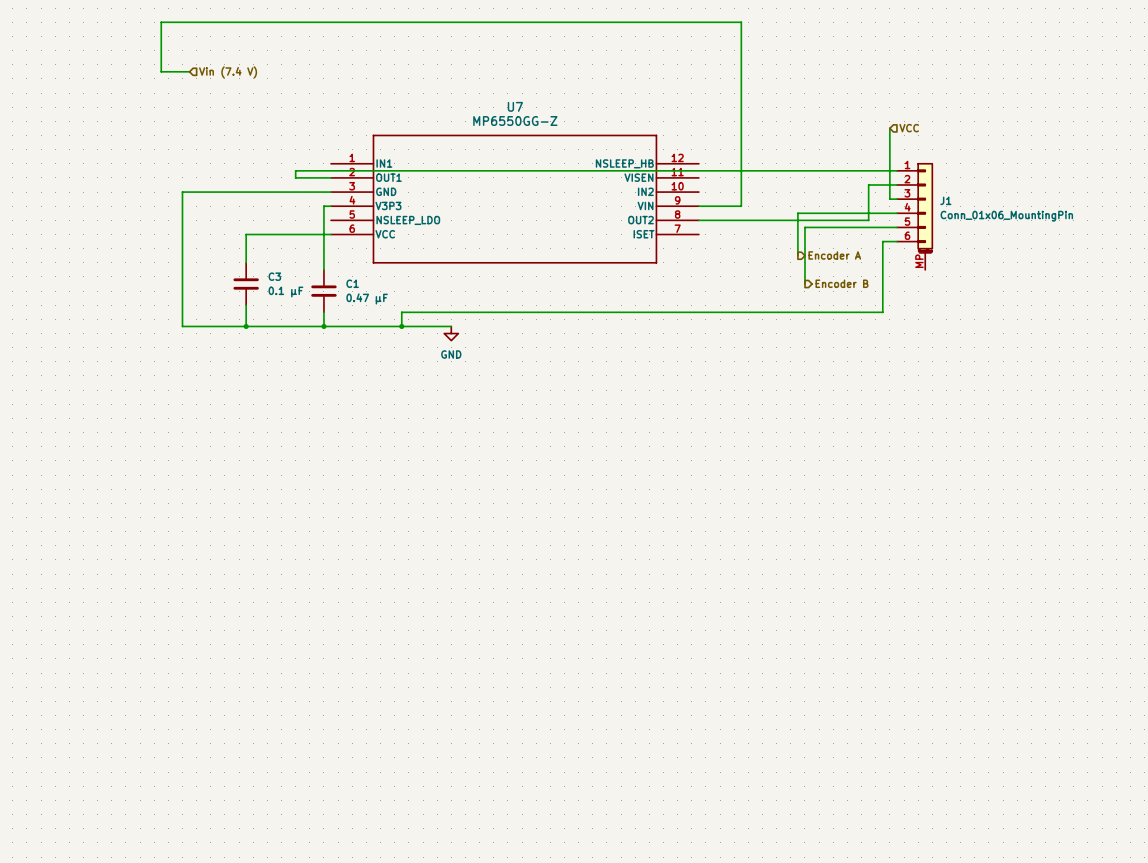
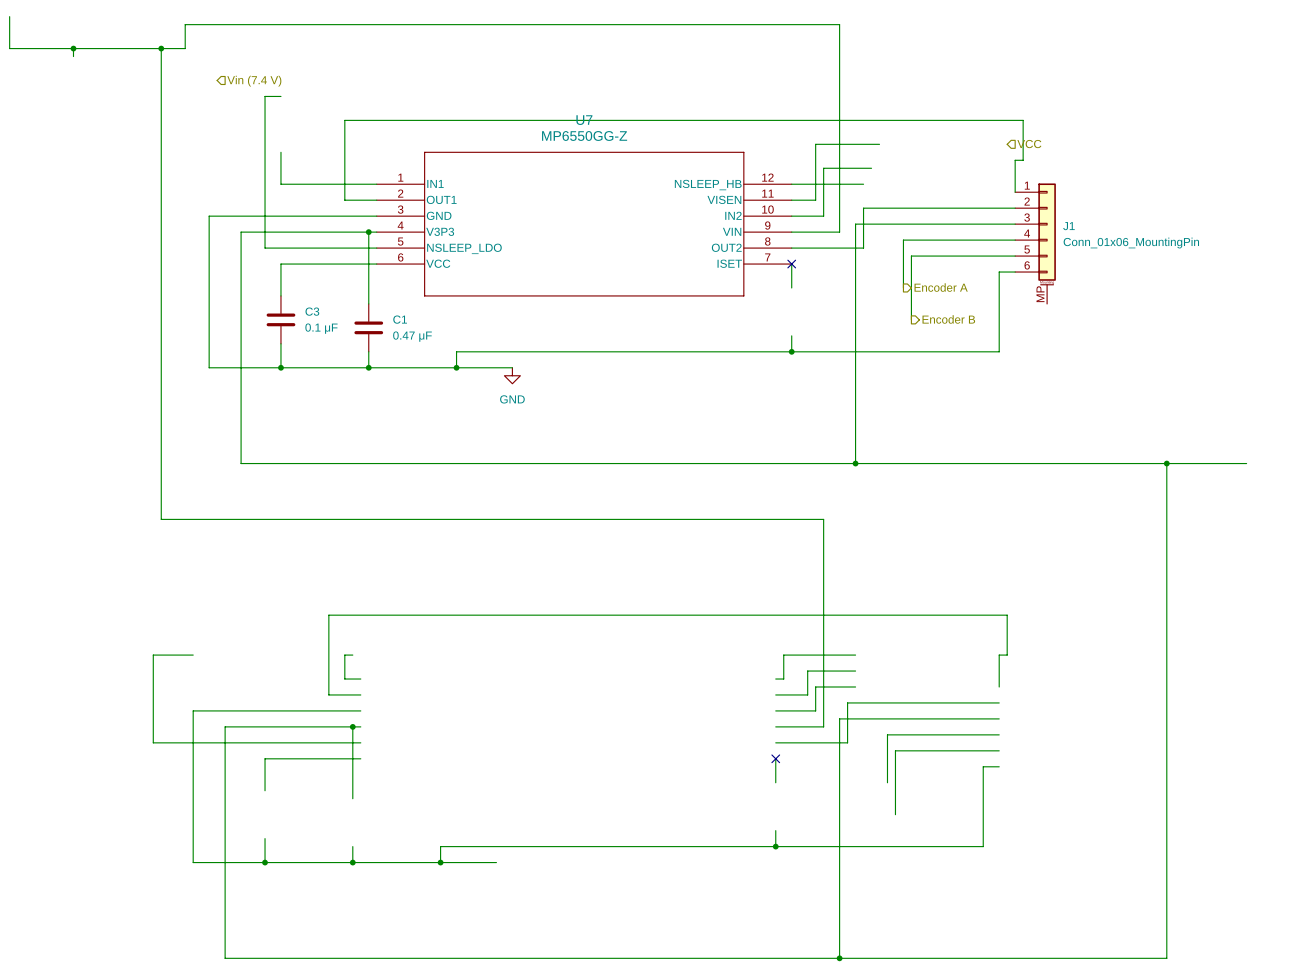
wire: none -> (73, 48) (73, 56)
junction: none -> (73, 48)
wire: none -> (161, 48) (161, 519) (823, 519) (823, 726) (775, 726)
junction: none -> (161, 48)
wire: (161, 43) (161, 71) (189, 71) -> (185, 48) (9, 48) (9, 16)
wire: none -> (280, 96) (265, 96) (265, 248) (376, 248)
wire: none -> (879, 144) (815, 144) (815, 200) (791, 200)
wire: (889, 128) (889, 199) -> (855, 463) (855, 224) (1007, 224)
wire: none -> (280, 152) (280, 184) (376, 184)
wire: none -> (871, 168) (823, 168) (823, 216) (791, 216)
wire: none -> (791, 184) (863, 184)
wire: (896, 170) (295, 170) (295, 177) (302, 177) -> (1015, 192) (1015, 160) (1023, 160) (1023, 120) (344, 120) (344, 200)
wire: (868, 184) (868, 220) (762, 220) -> (983, 208) (863, 208) (863, 248)
wire: none -> (368, 232) (241, 232) (241, 463) (1246, 463)
junction: none -> (368, 232)
wire: none -> (791, 264) (791, 287)
no-connect mark: none -> (791, 264)
wire: none -> (791, 335) (791, 351)
junction: none -> (791, 351)
junction: none -> (855, 463)
wire: none -> (1166, 463) (1166, 958) (225, 958) (225, 726) (360, 726)
junction: none -> (1166, 463)
wire: none -> (193, 655) (153, 655) (153, 742) (360, 742)
wire: none -> (352, 655) (344, 655) (344, 679) (360, 679)
wire: none -> (855, 655) (783, 655) (783, 679) (775, 679)
wire: none -> (855, 671) (807, 671) (807, 694) (775, 694)
wire: none -> (855, 686) (815, 686) (815, 710) (775, 710)
wire: none -> (999, 686) (999, 655) (1007, 655) (1007, 615) (328, 615) (328, 694) (360, 694)
wire: none -> (999, 702) (847, 702) (847, 742) (775, 742)
wire: none -> (360, 710) (193, 710) (193, 862) (496, 862)
wire: none -> (999, 718) (839, 718) (839, 958)
wire: none -> (352, 726) (352, 798)
junction: none -> (352, 726)
wire: none -> (999, 734) (887, 734) (887, 782)
wire: none -> (999, 750) (895, 750) (895, 814)
wire: none -> (360, 758) (265, 758) (265, 790)
wire: none -> (775, 758) (775, 782)
no-connect mark: none -> (775, 758)
wire: none -> (999, 766) (983, 766) (983, 846) (440, 846) (440, 862)
wire: none -> (775, 830) (775, 846)
wire: none -> (265, 838) (265, 862)
wire: none -> (352, 846) (352, 862)
junction: none -> (775, 846)
junction: none -> (265, 862)
junction: none -> (352, 862)
junction: none -> (440, 862)
junction: none -> (839, 958)

